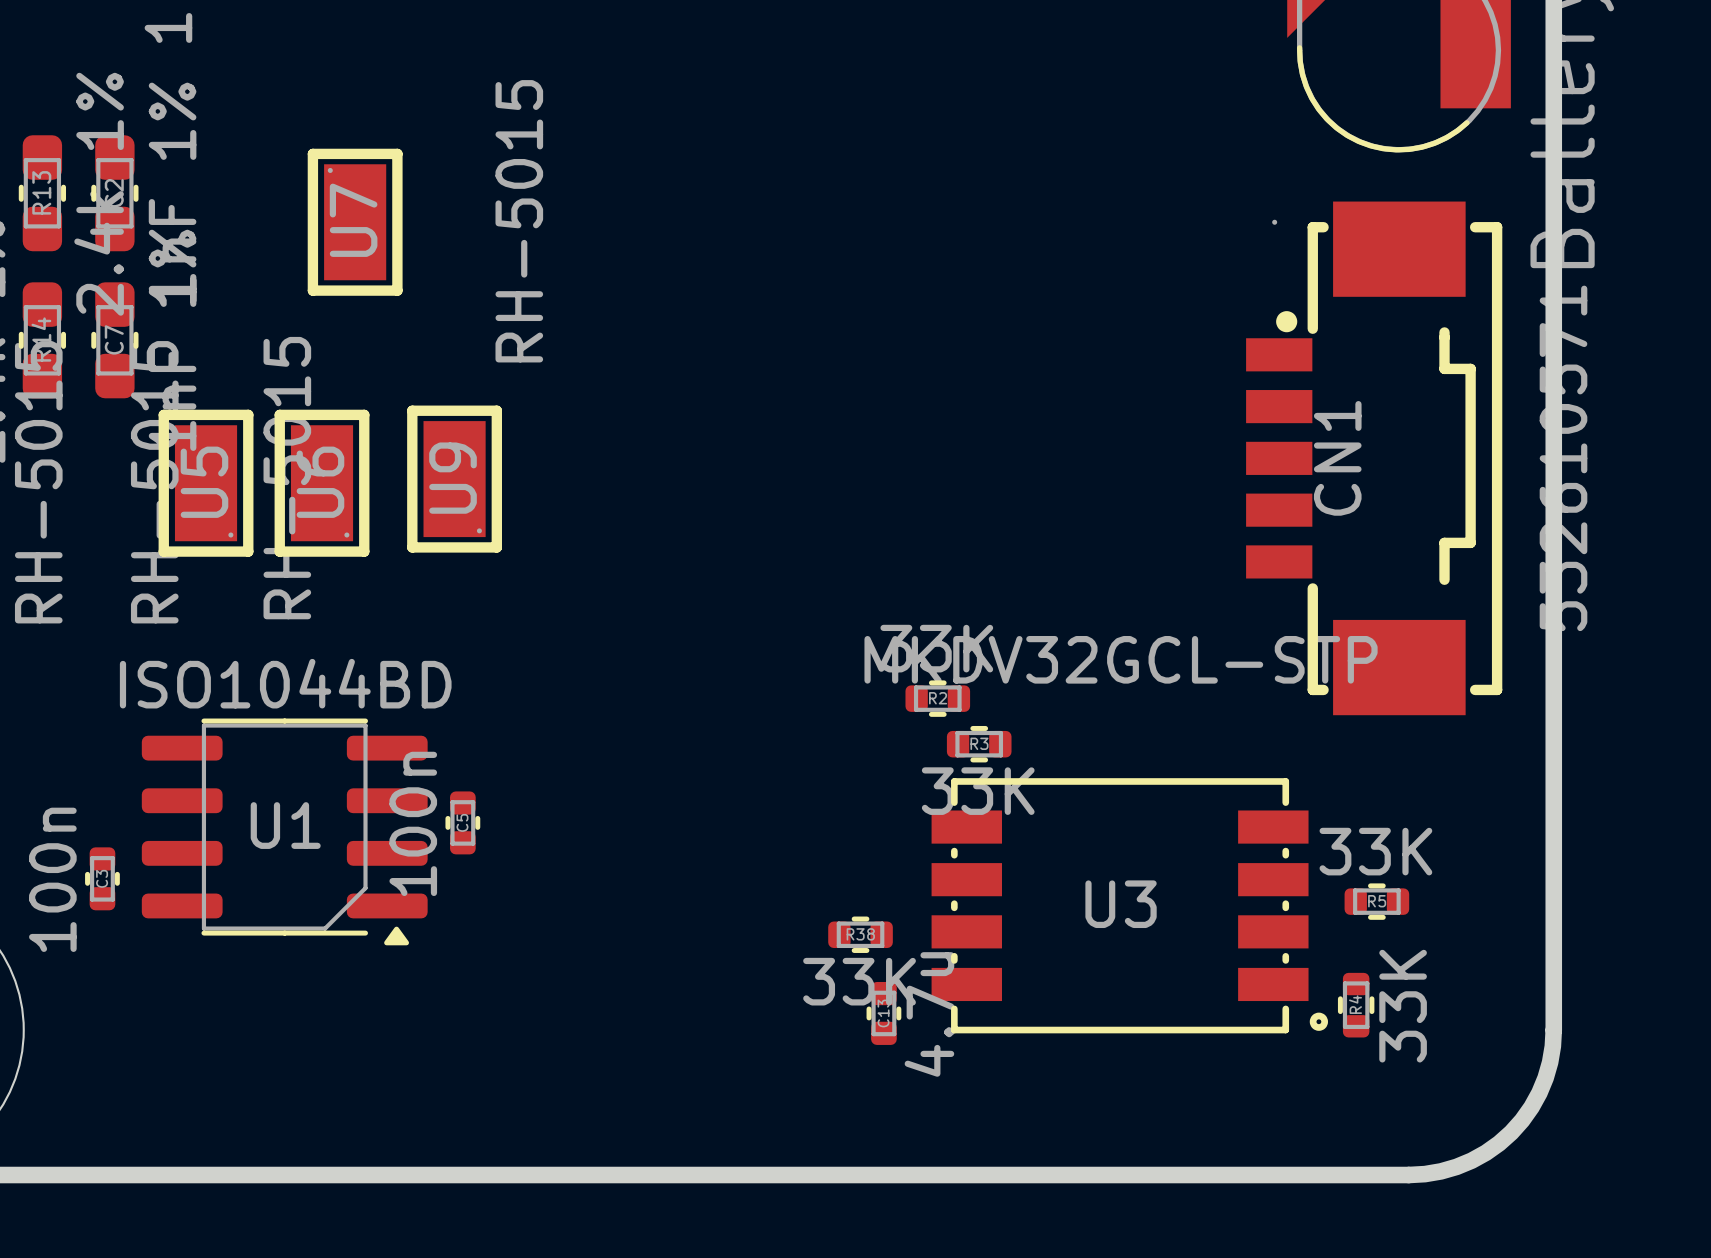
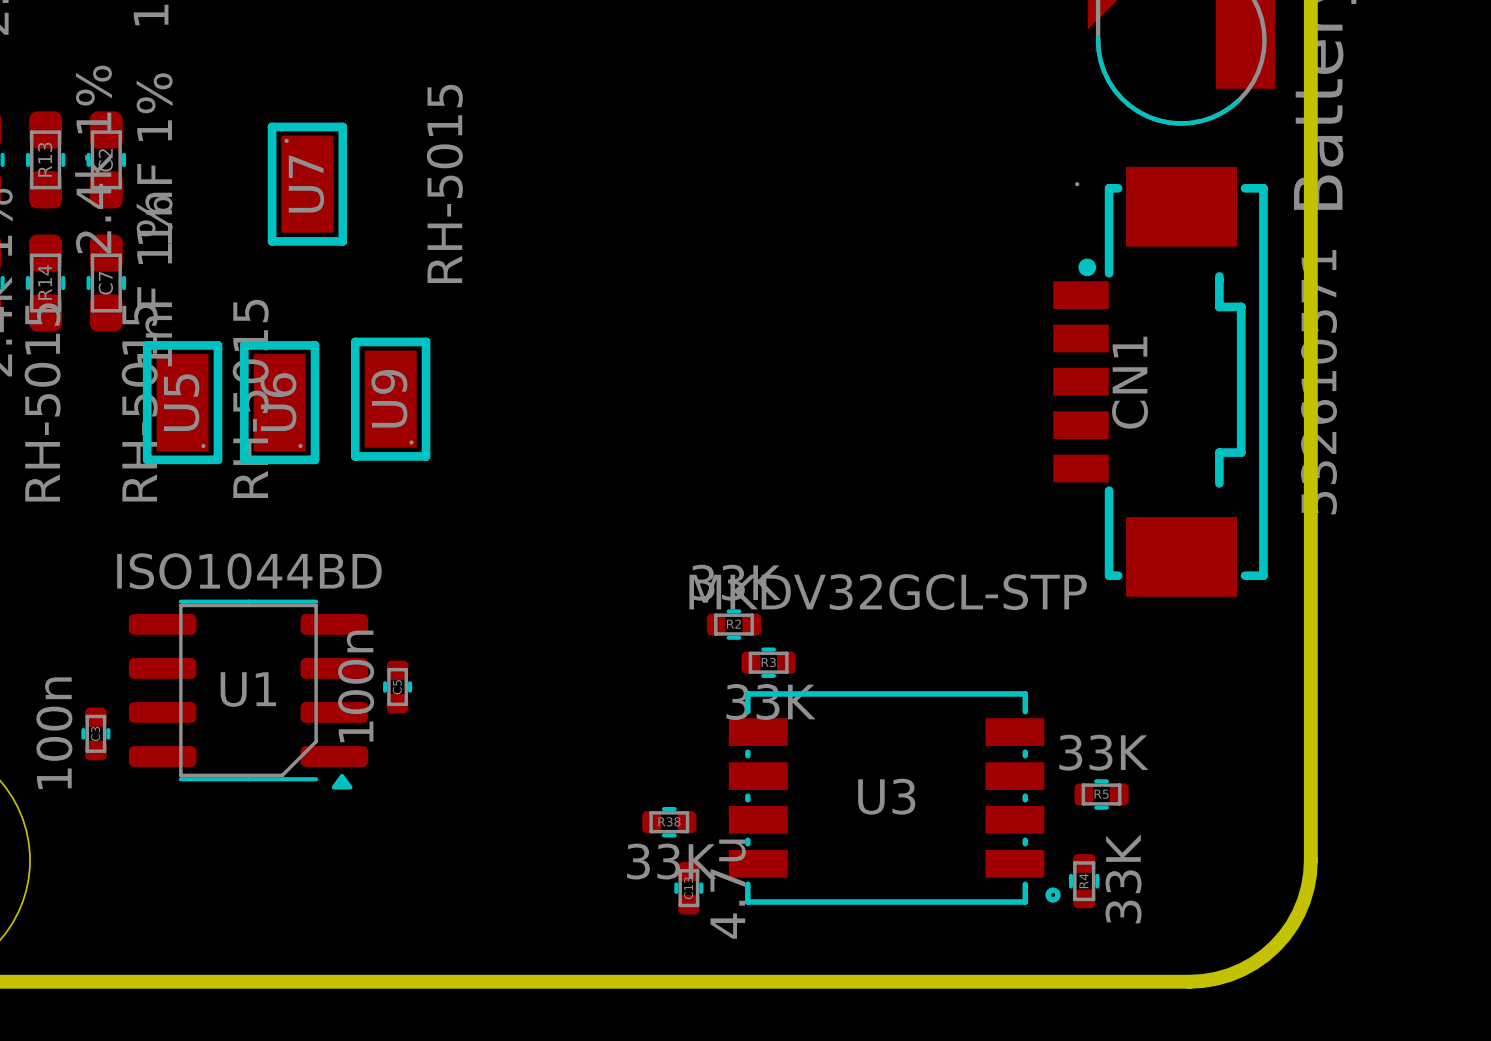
R2 position: (937, 698) -> (733, 624)
R3 position: (979, 744) -> (768, 662)
R5 position: (1376, 901) -> (1101, 794)
U3 position: (1129, 905) -> (894, 797)
R38 position: (860, 934) -> (669, 822)
R4 position: (1356, 1005) -> (1084, 881)
C13 position: (883, 1013) -> (688, 888)

